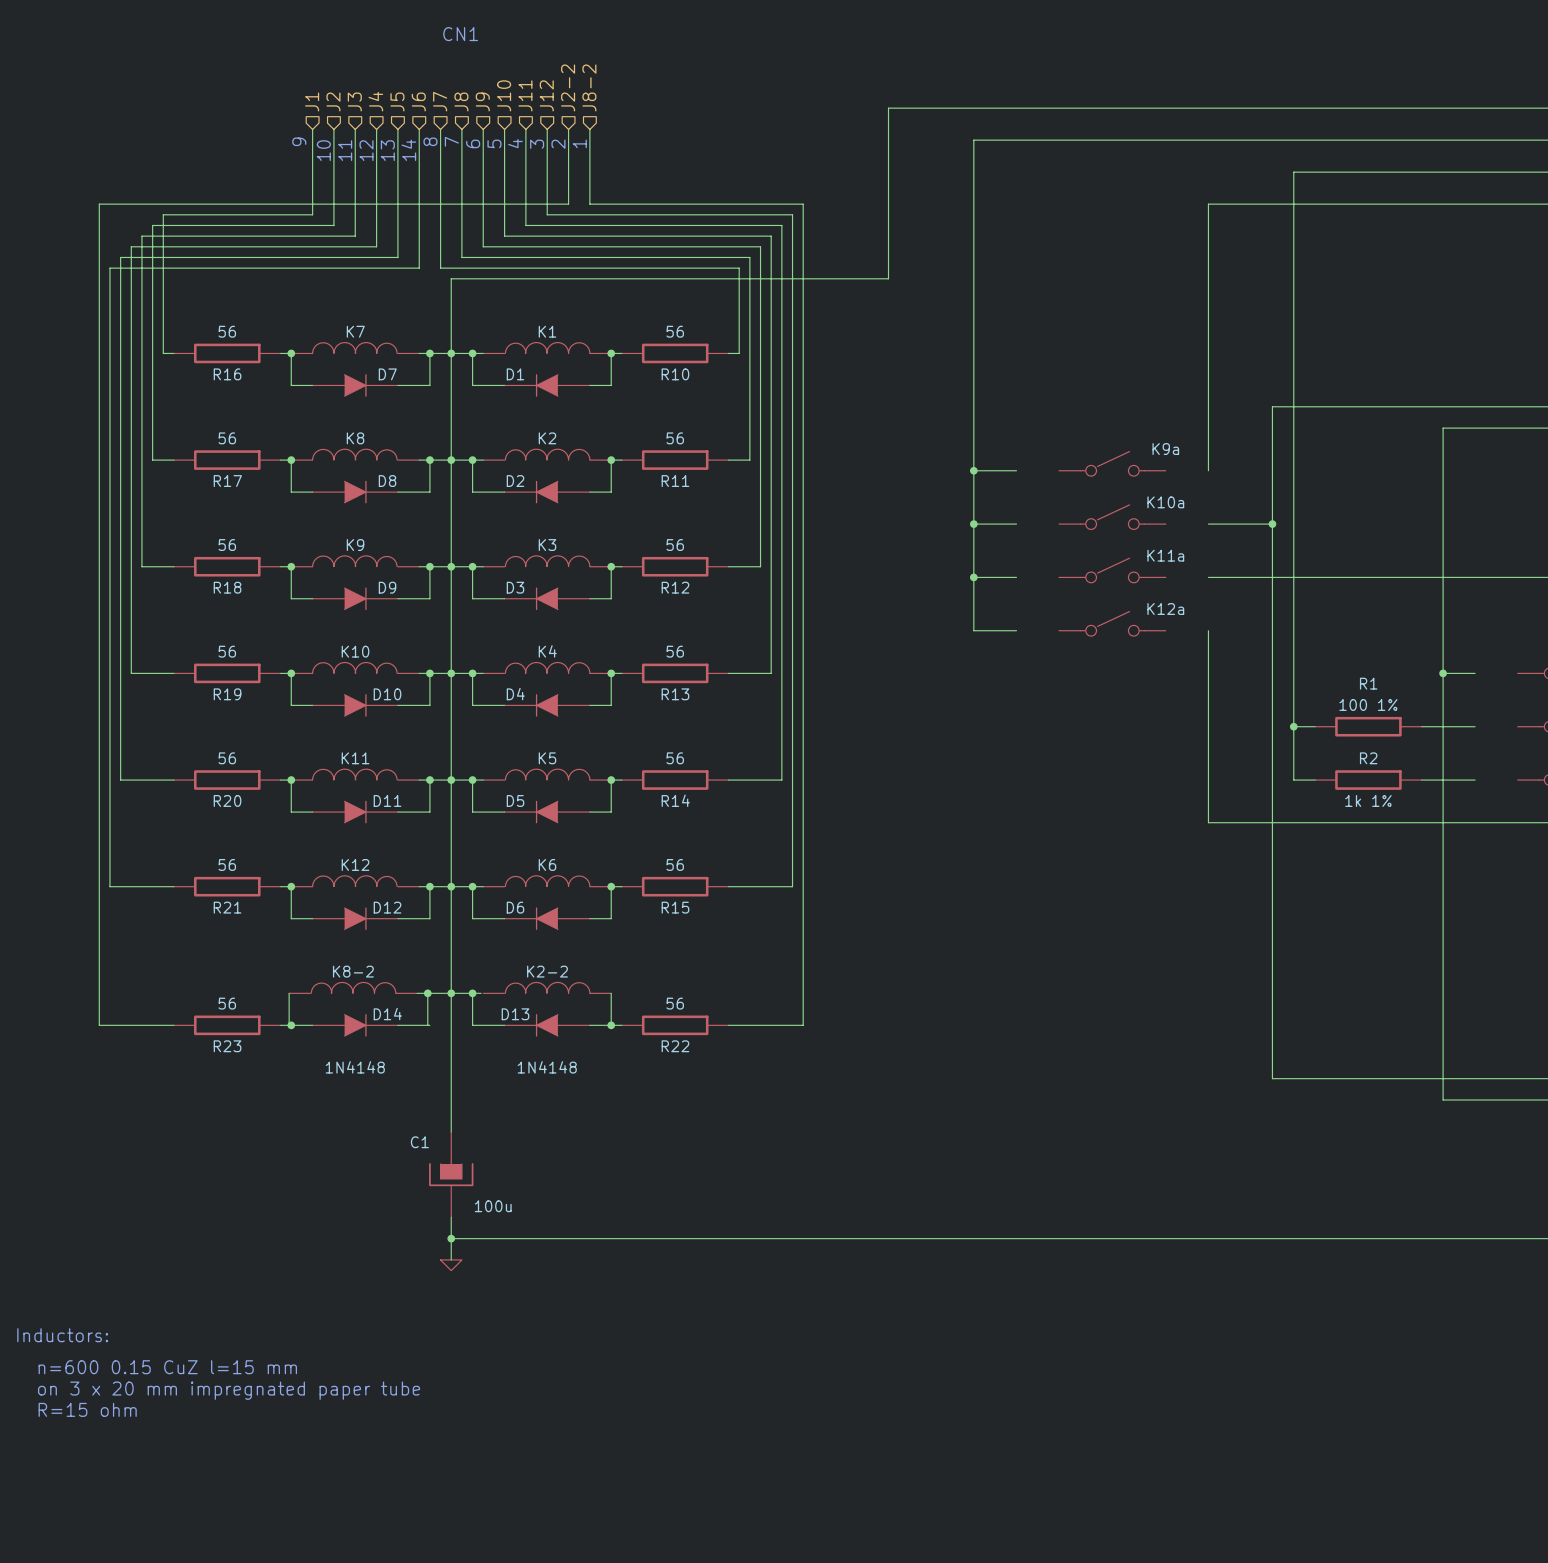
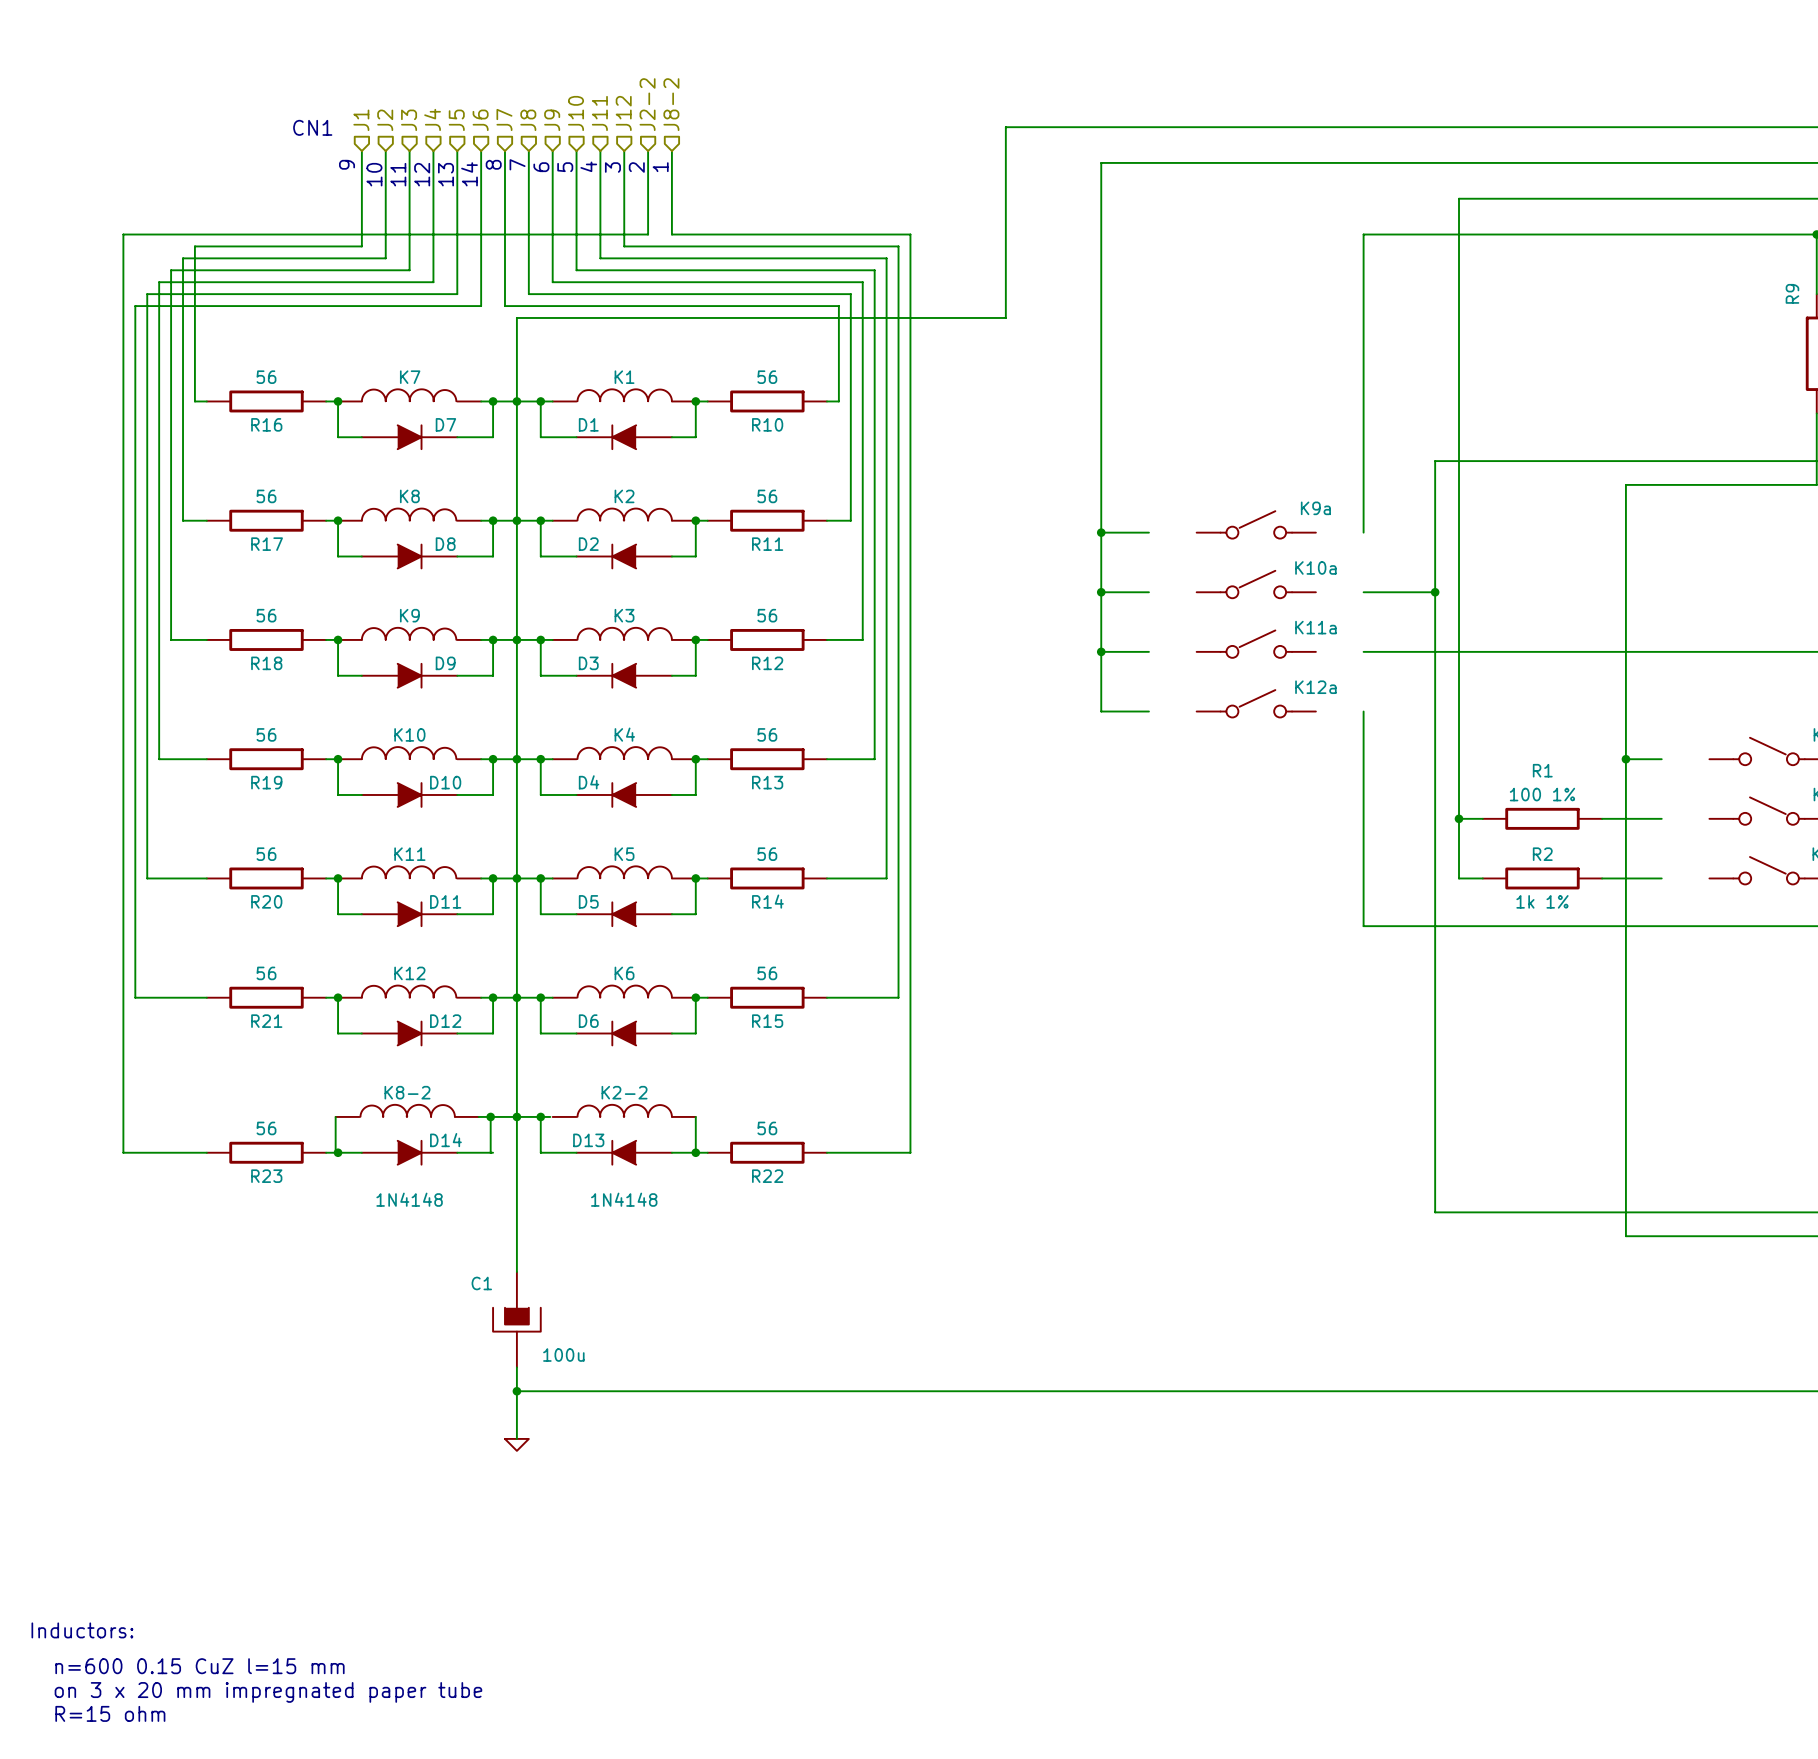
text position: CN1 (460, 34) -> CN1 (312, 127)
wire: none -> (516, 1415) (516, 1438)
power symbol position: (451, 1265) -> (516, 1444)
text position: Inductors: (62, 1335) -> Inductors: (82, 1630)
text position: n=600 0.15 CuZ l=15 mm (167, 1367) -> n=600 0.15 CuZ l=15 mm (199, 1666)
text position: on 3 x 20 mm impregnated paper tube (229, 1390) -> on 3 x 20 mm impregnated paper tube (268, 1692)
text position: R=15 ohm (87, 1409) -> R=15 ohm (110, 1713)

